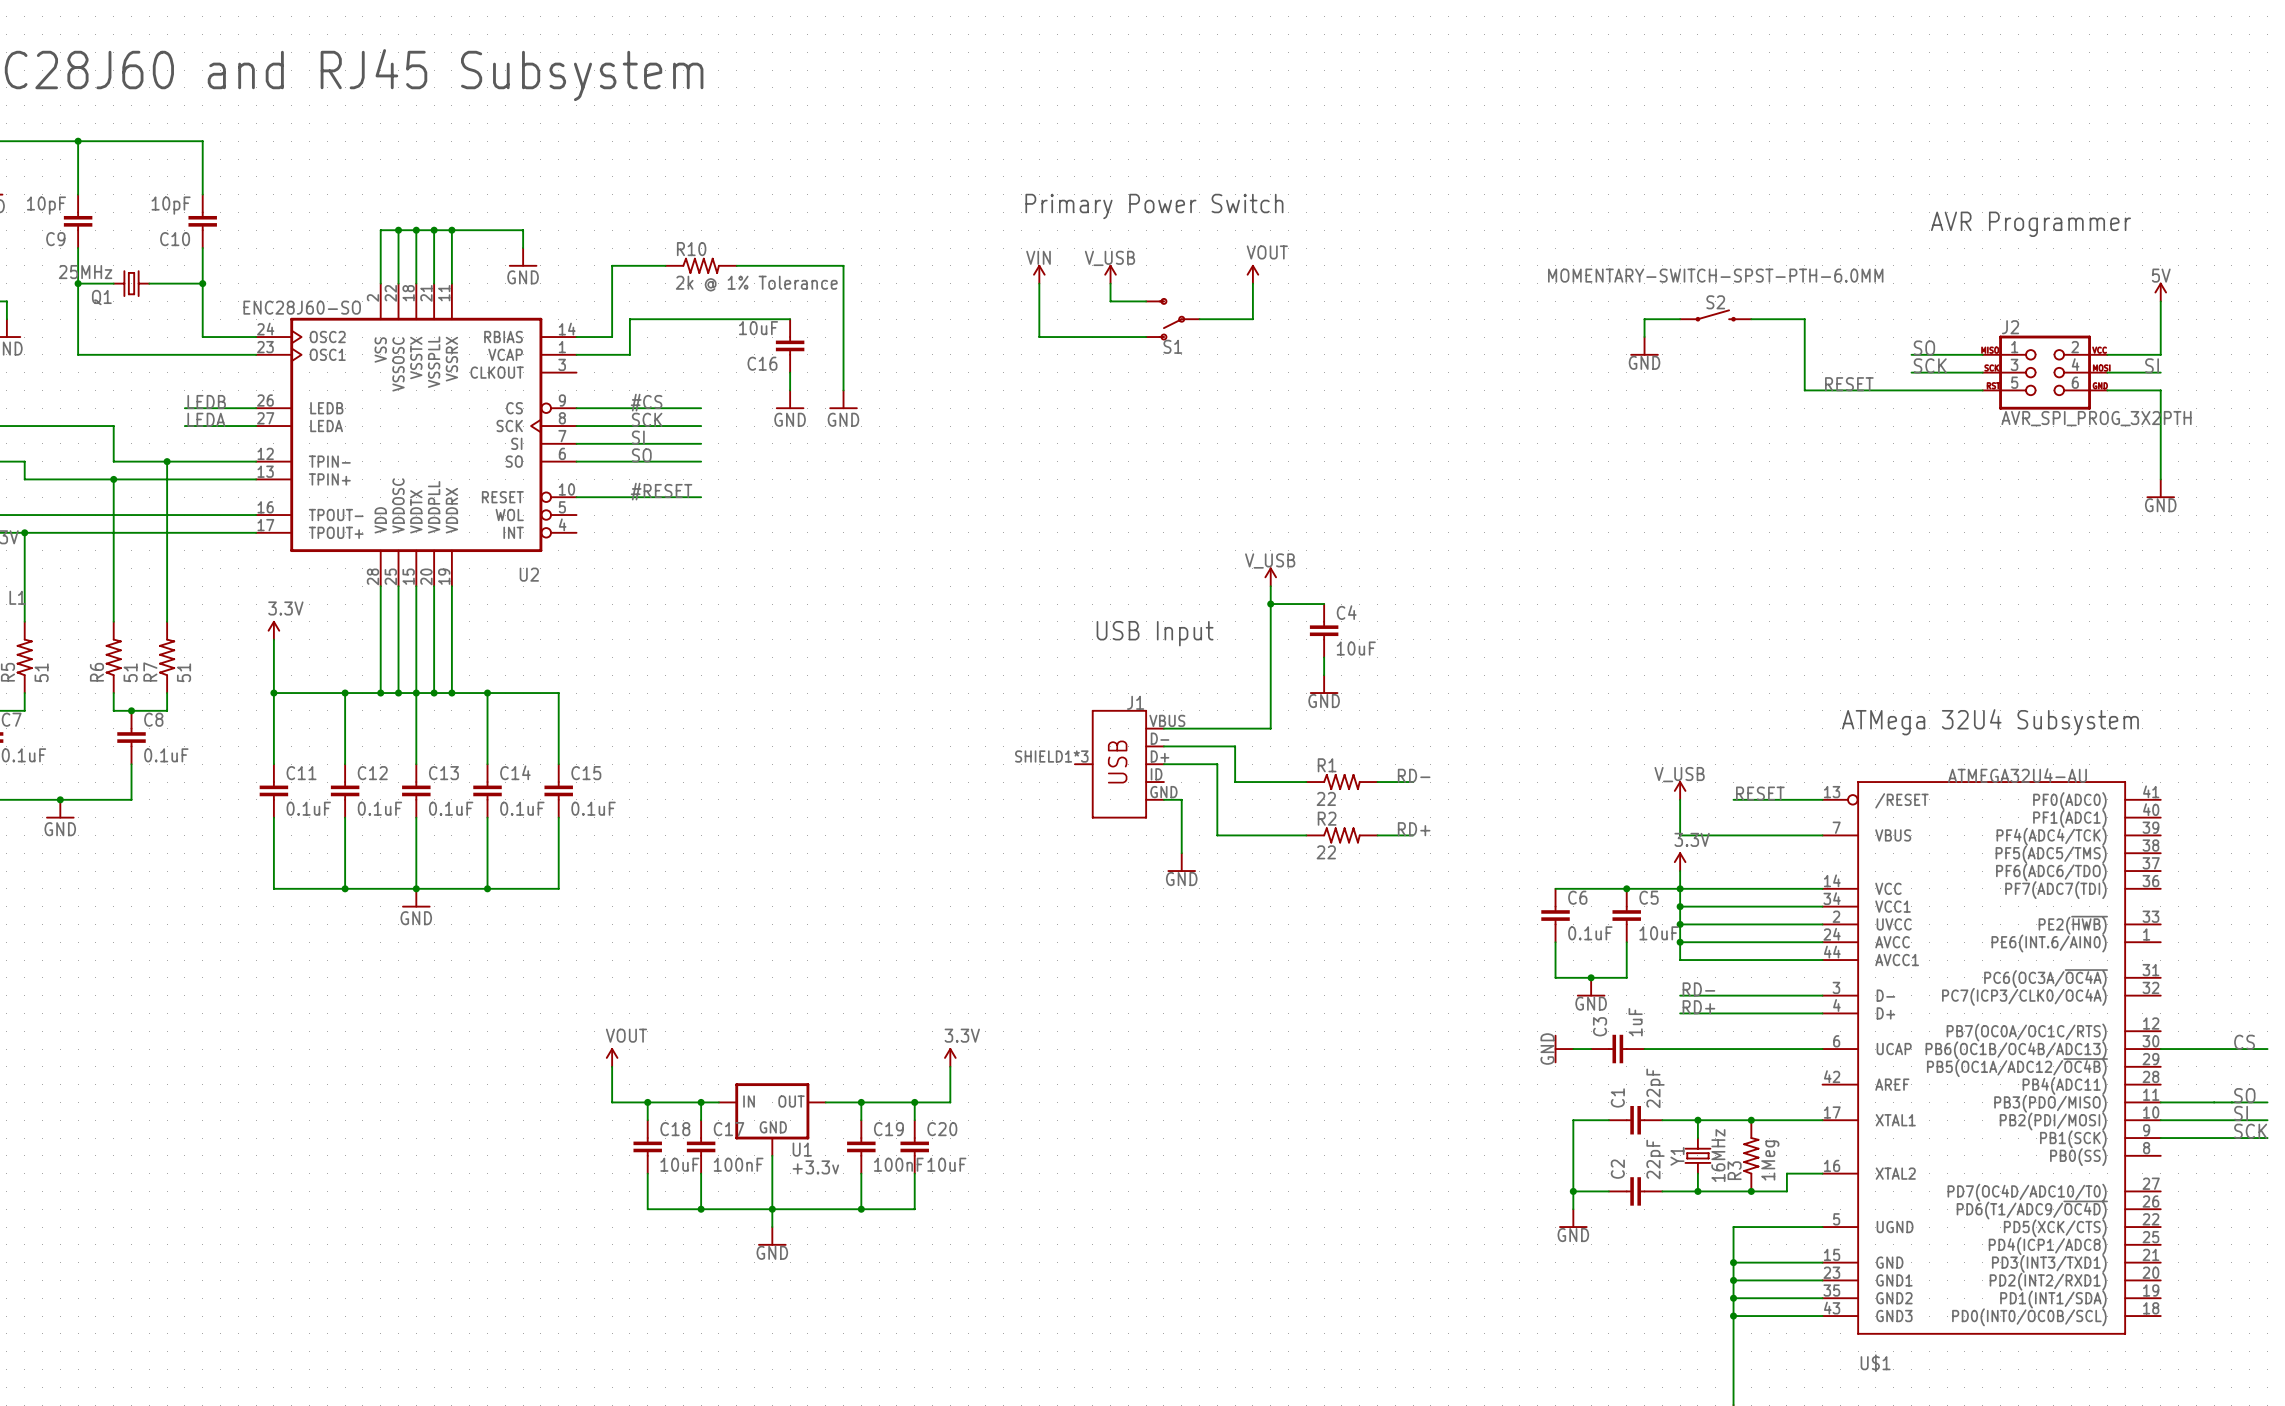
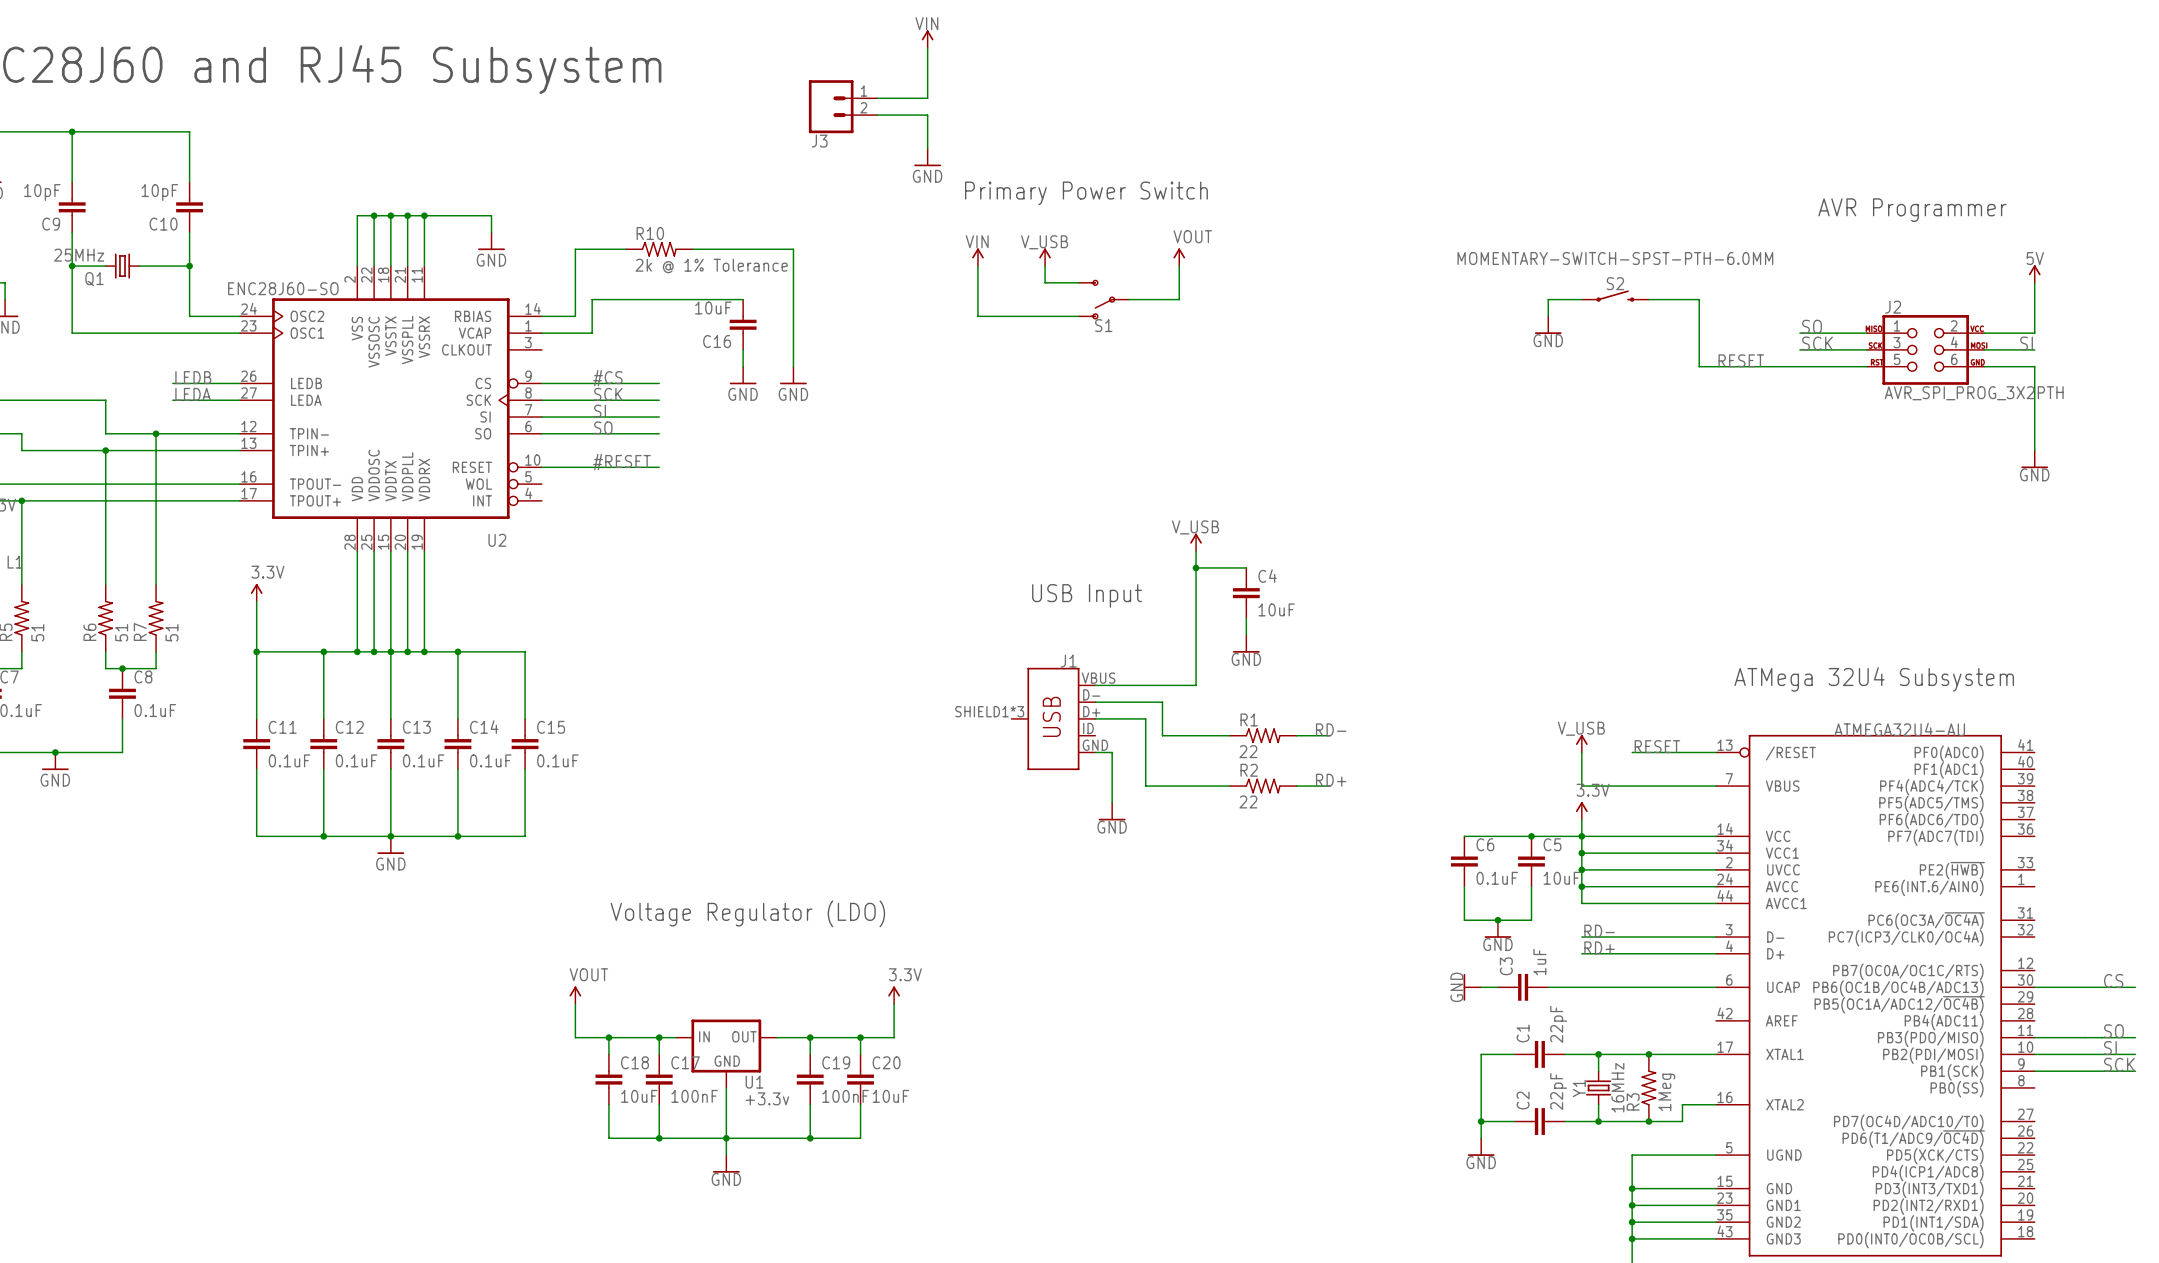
power symbol: none -> VIN (927, 39)
wire: none -> (927, 47) (927, 98) (877, 98)
J3: none -> (843, 106)
wire: none -> (877, 115) (927, 115) (927, 148)
power symbol: none -> GND (927, 157)
text: none -> Voltage Regulator (LDO) (747, 913)

